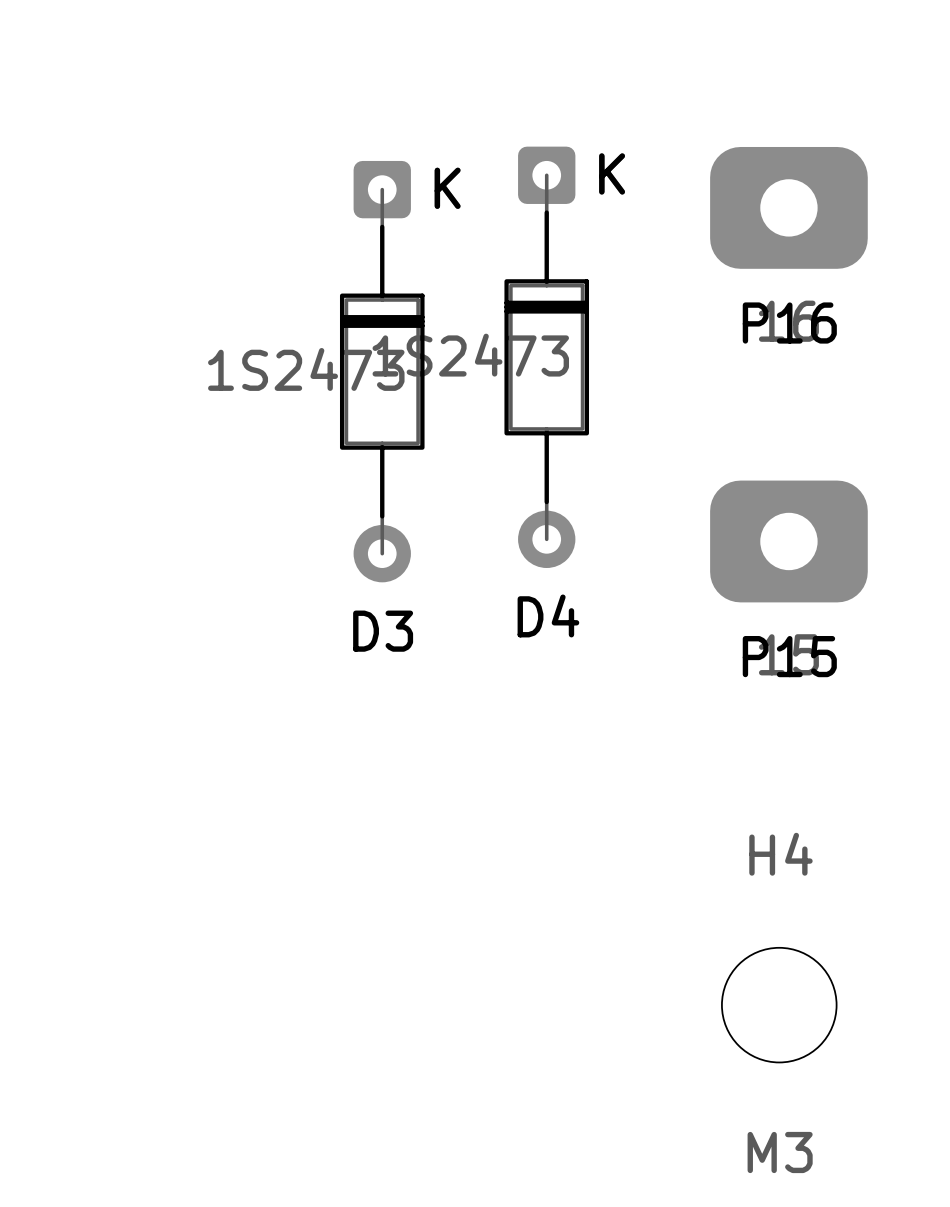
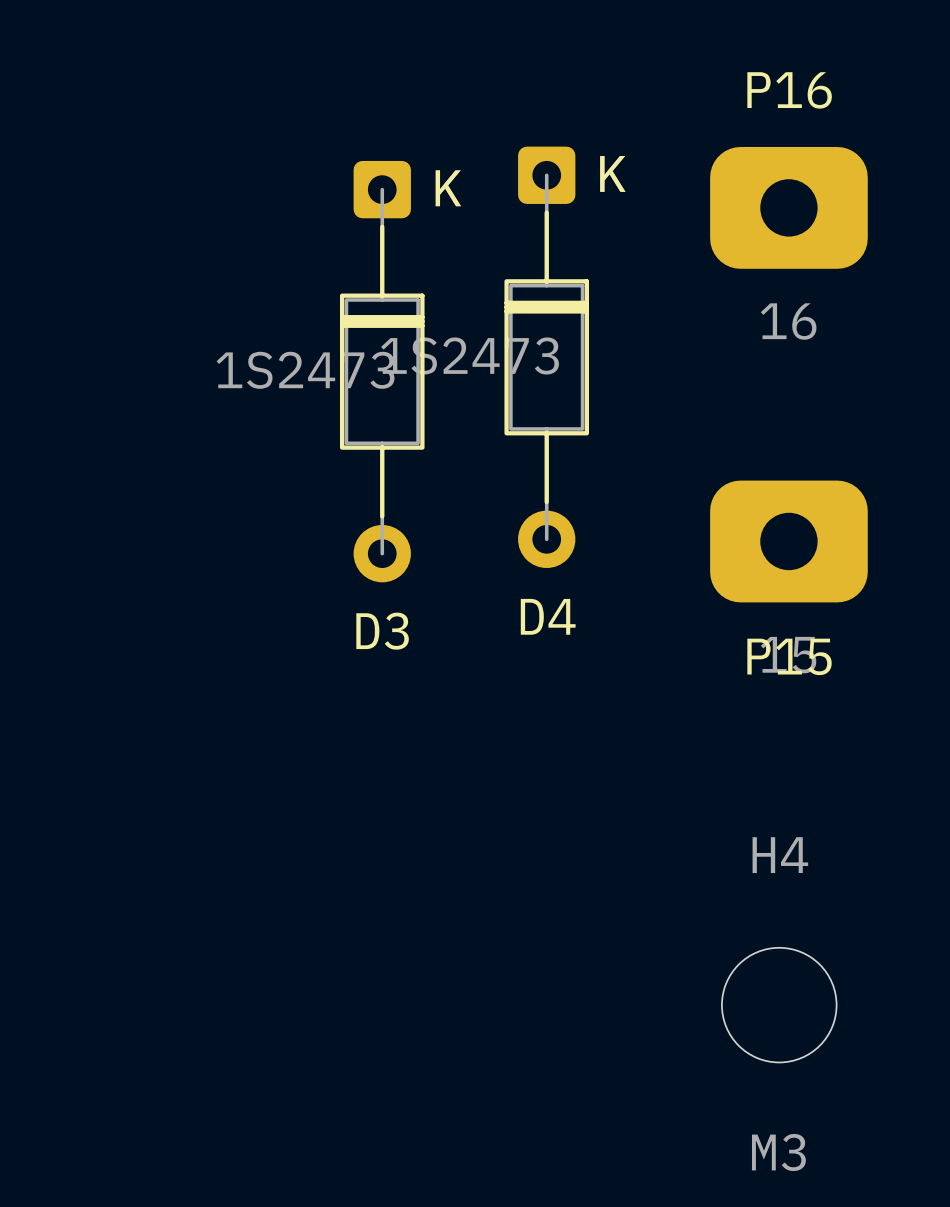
P16 name position: P16 (789, 323) -> P16 (789, 90)

